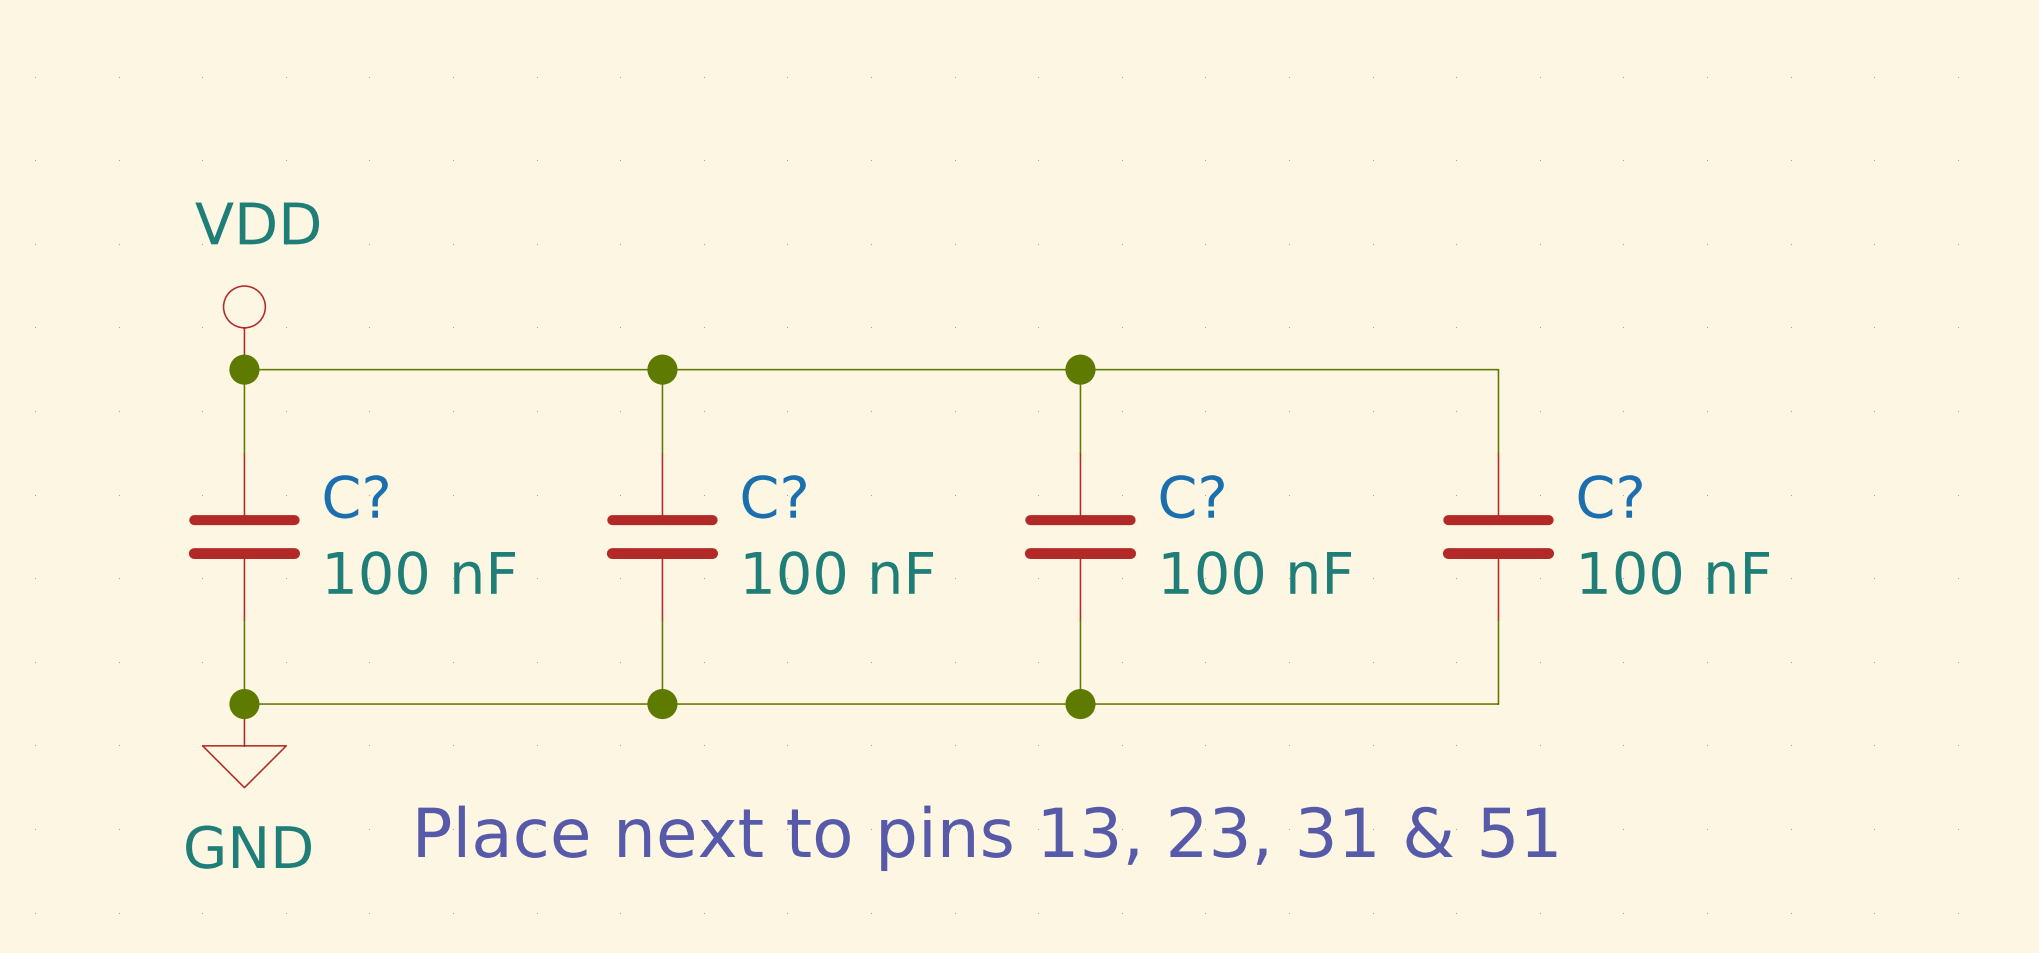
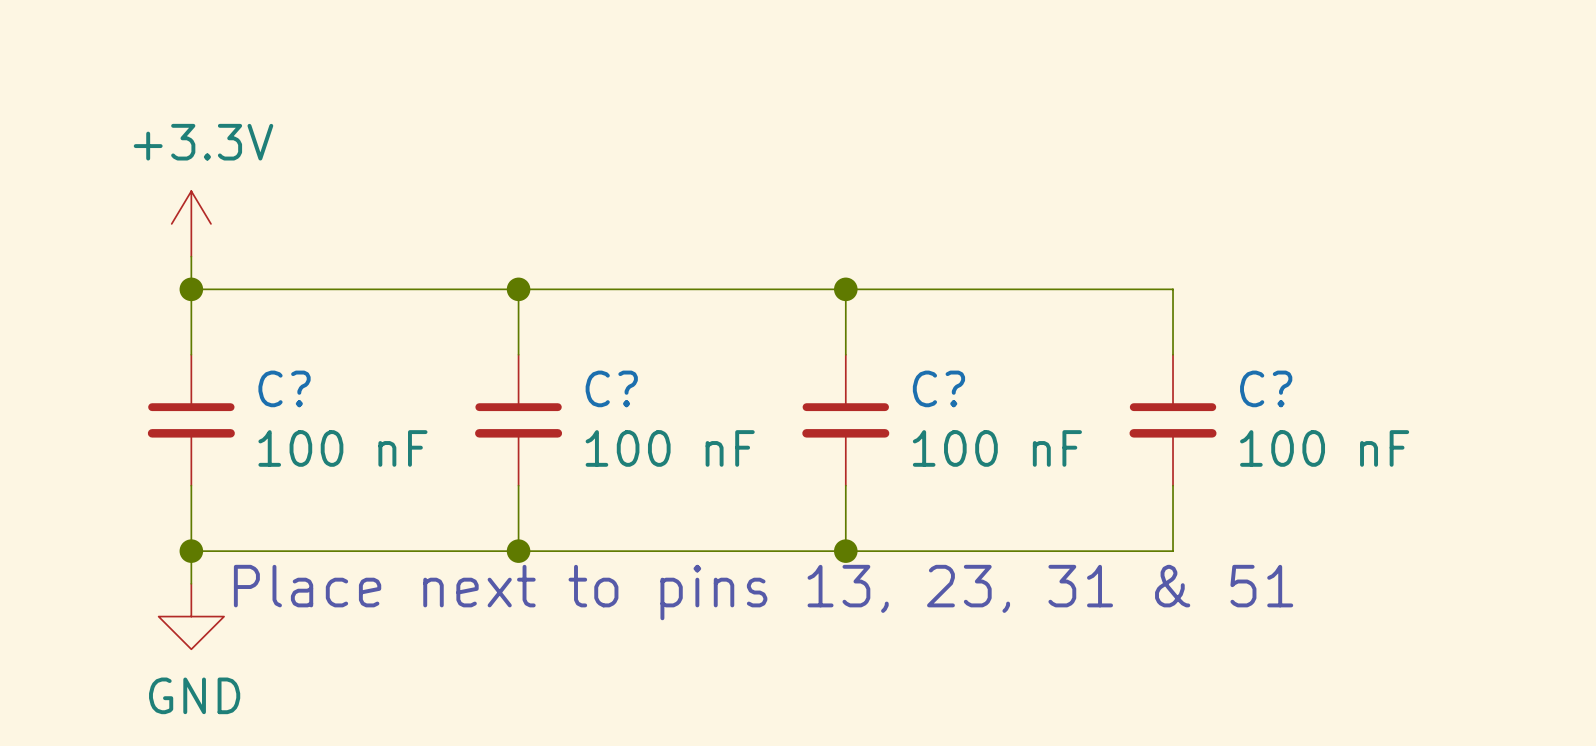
power symbol: none -> +3.3V (191, 223)
power symbol: VDD (244, 327) -> none
power symbol position: GND (244, 745) -> GND (191, 616)
text position: Place next to pins 13, 23, 31 & 51 (987, 838) -> Place next to pins 13, 23, 31 & 51 (763, 592)

